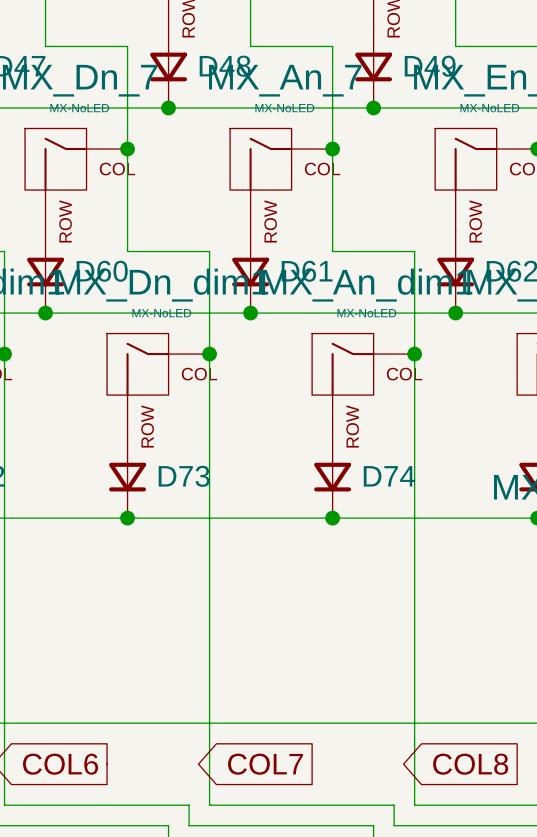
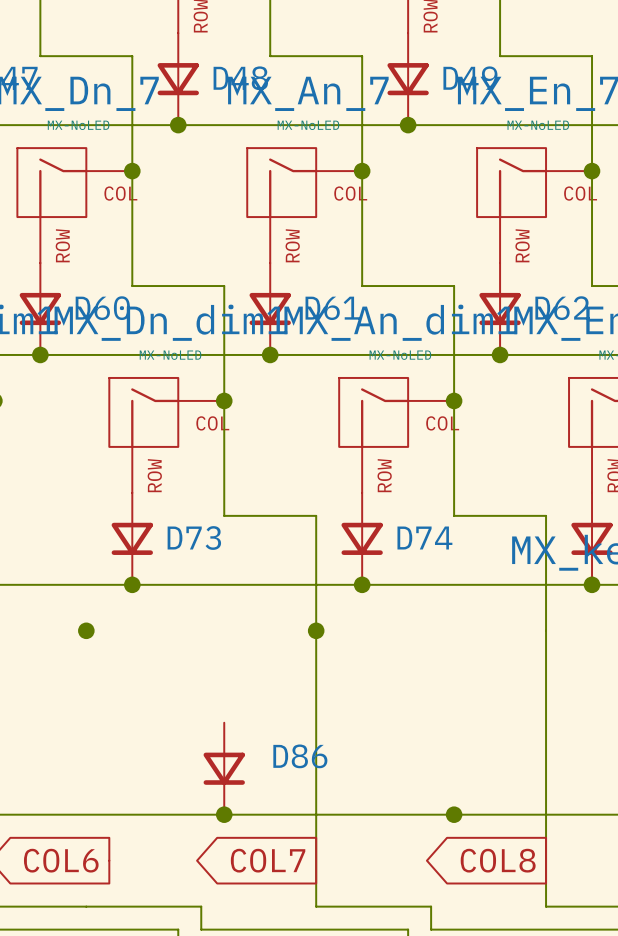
wire: (209, 456) (209, 805) (291, 805) -> (224, 515) (316, 515) (316, 906)
wire: (414, 456) (414, 805) (496, 805) -> (454, 515) (546, 515) (546, 906)
junction: none -> (86, 630)
junction: none -> (316, 630)
D86: none -> (224, 768)
junction: none -> (224, 814)
junction: none -> (454, 814)
global label position: COL7 (265, 764) -> COL7 (268, 860)
global label position: COL8 (470, 764) -> COL8 (498, 860)

